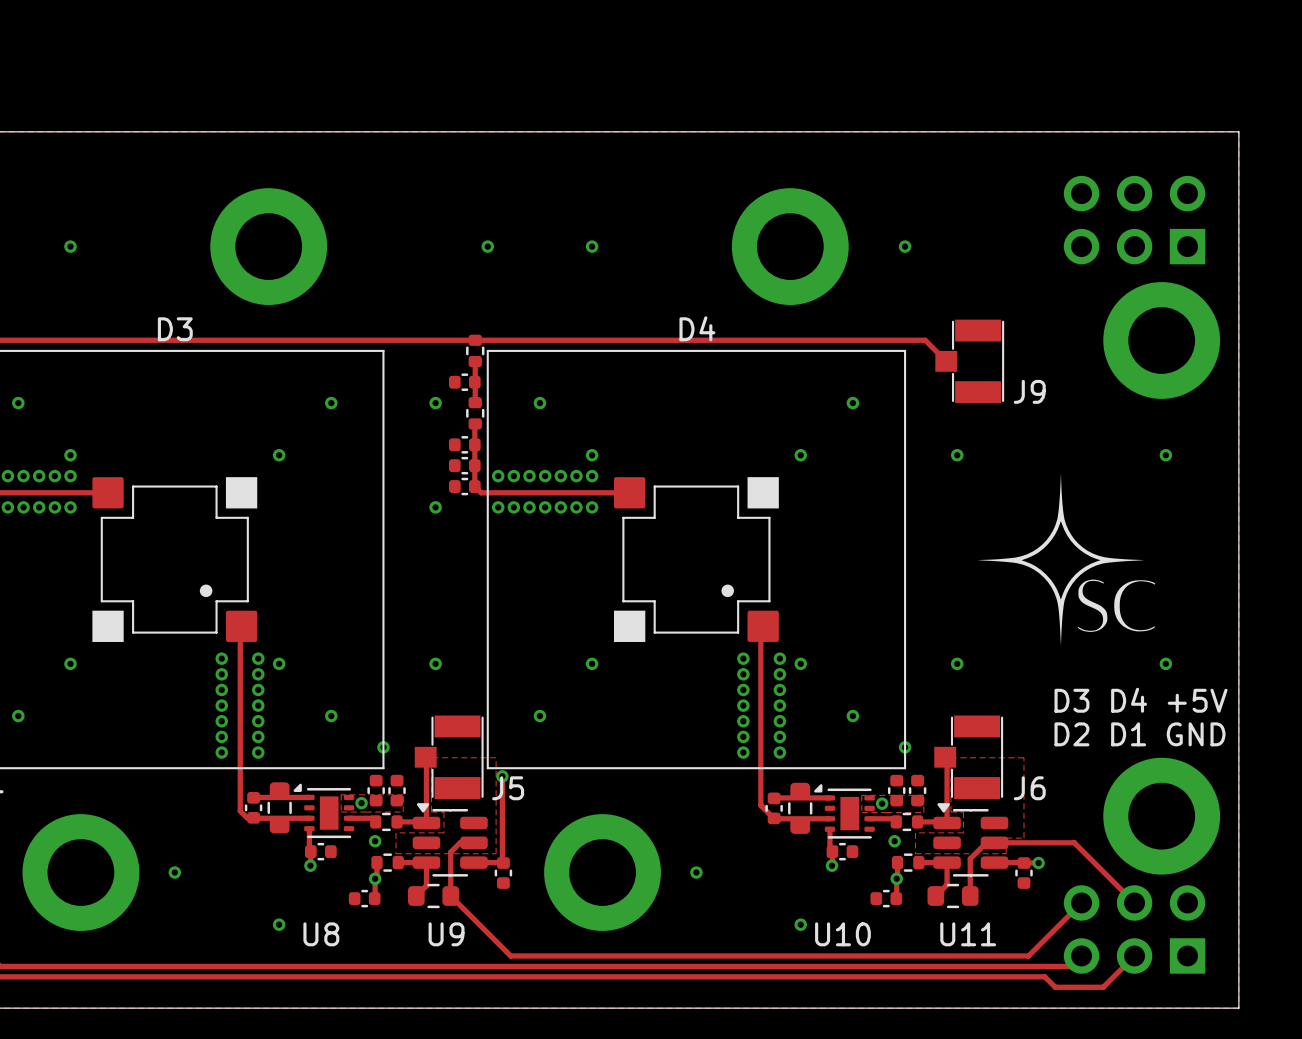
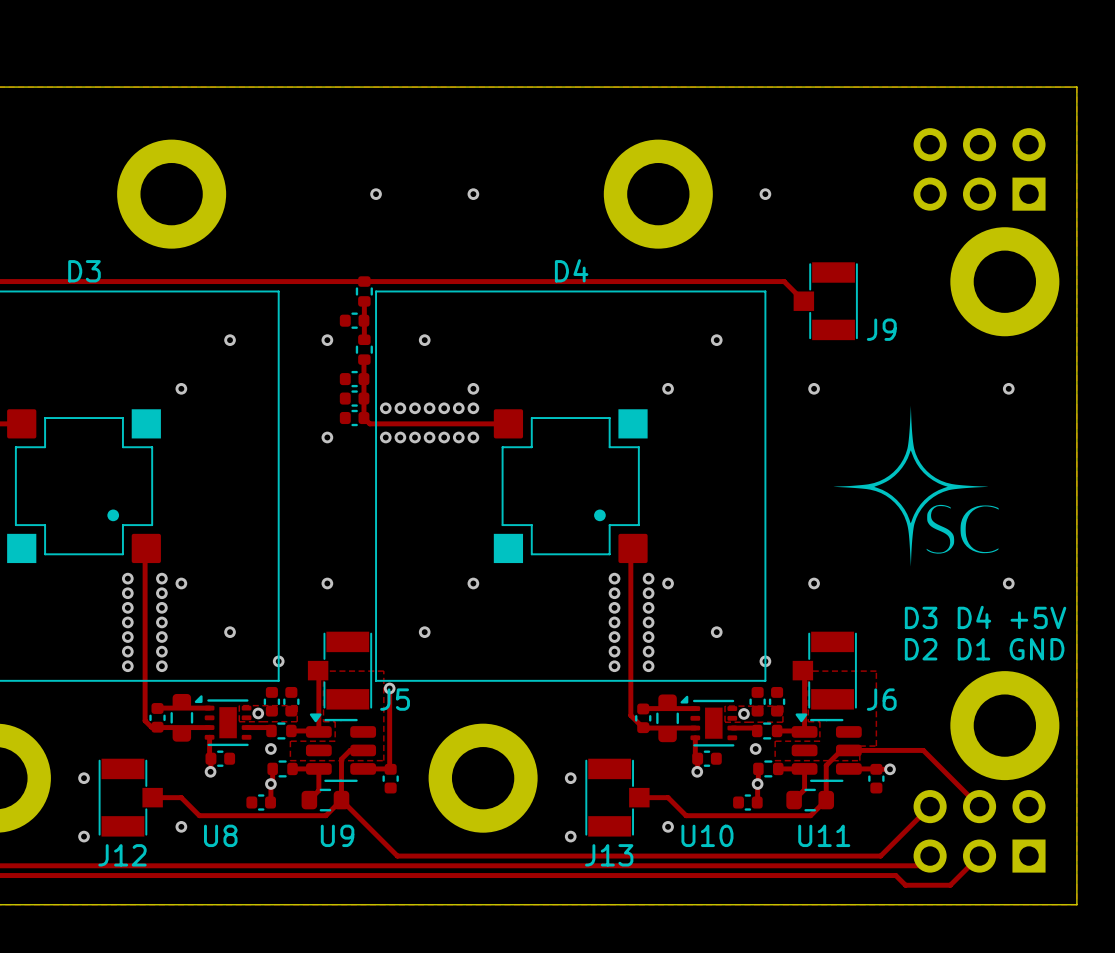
J12: none -> (130, 797)
track: none -> (152, 797) (181, 797) (199, 815) (325, 815) (341, 800)
J13: none -> (617, 797)
track: none -> (639, 797) (668, 797) (686, 815) (810, 815) (826, 800)
via: none -> (84, 836)
via: none -> (570, 836)

